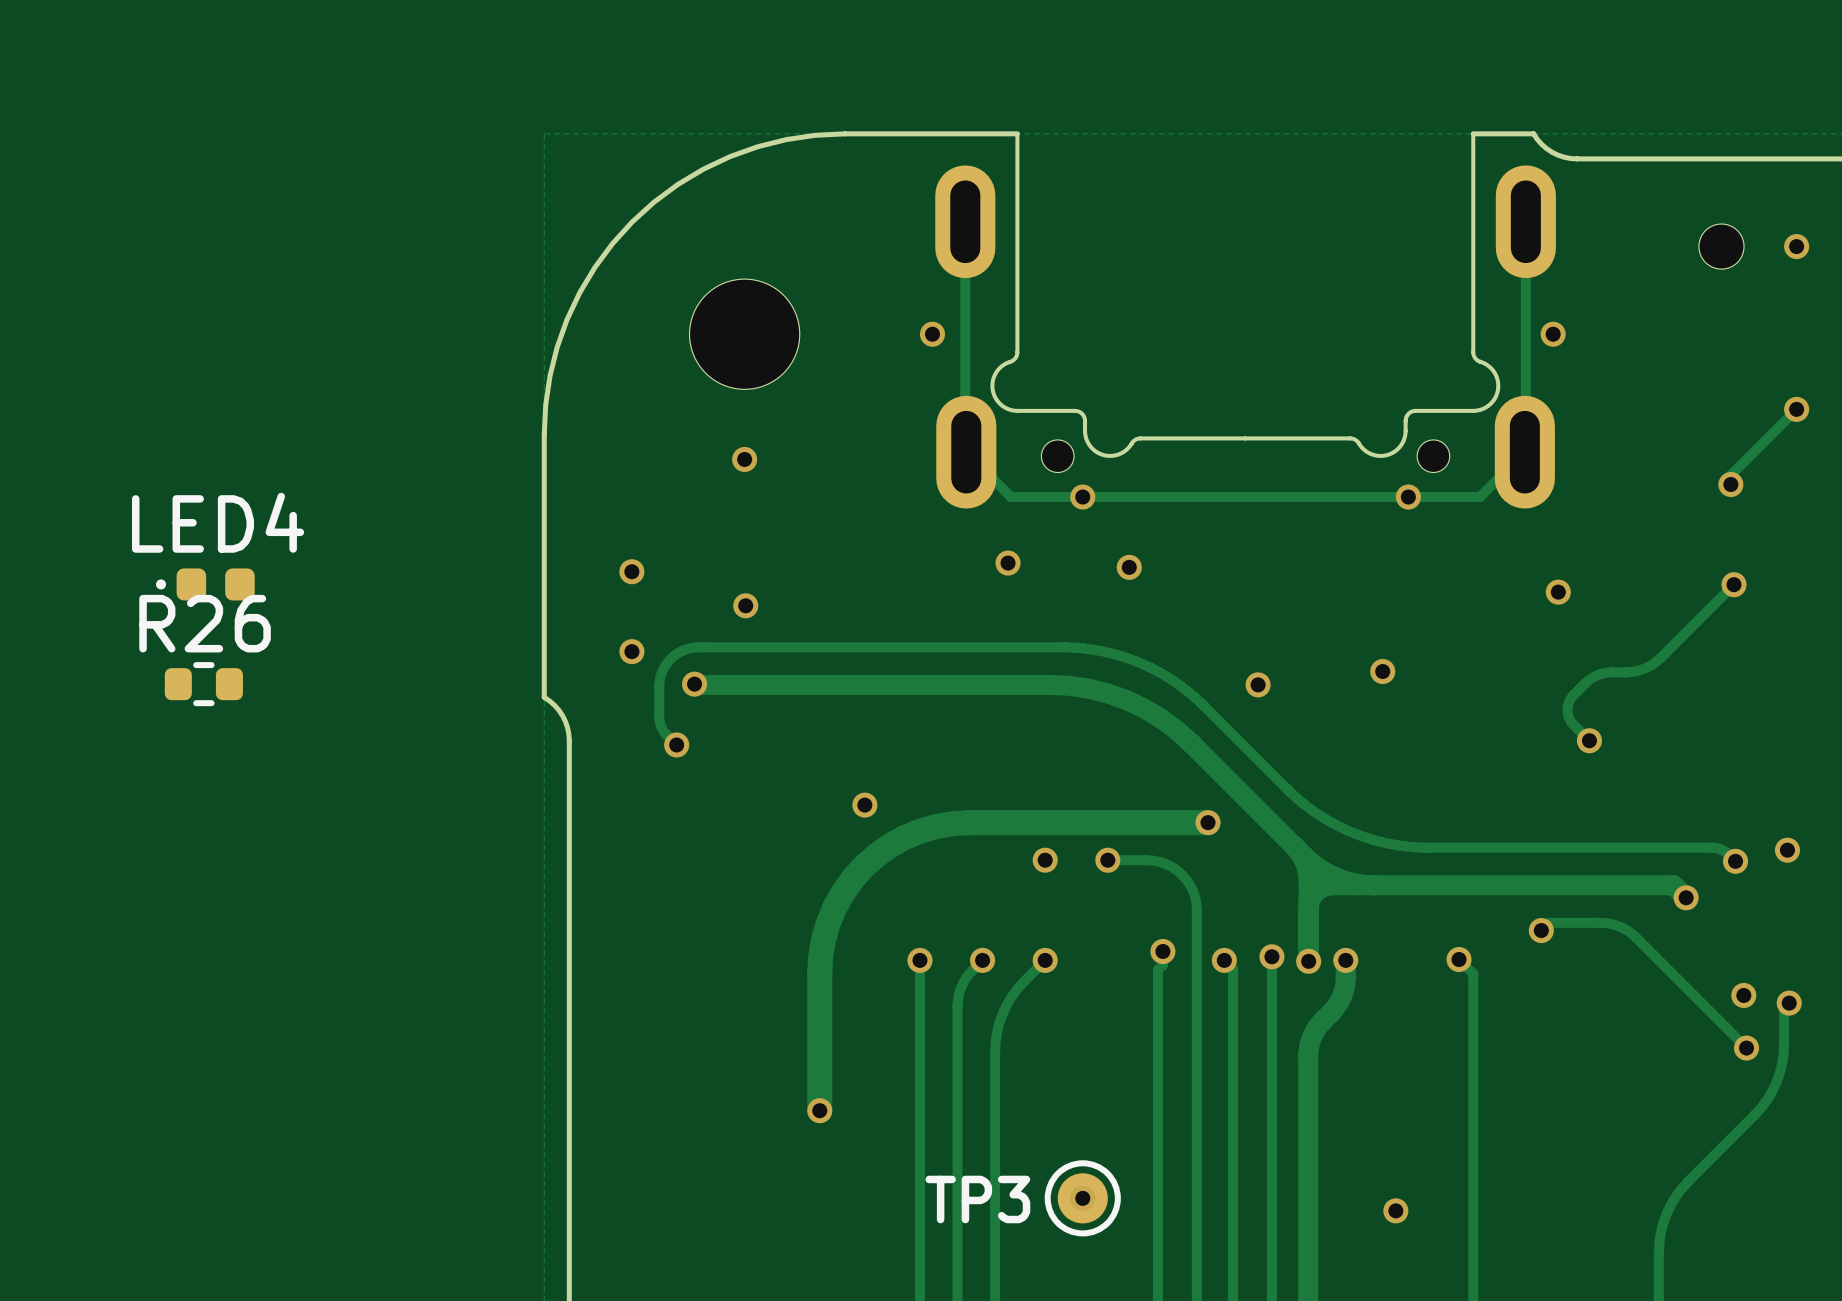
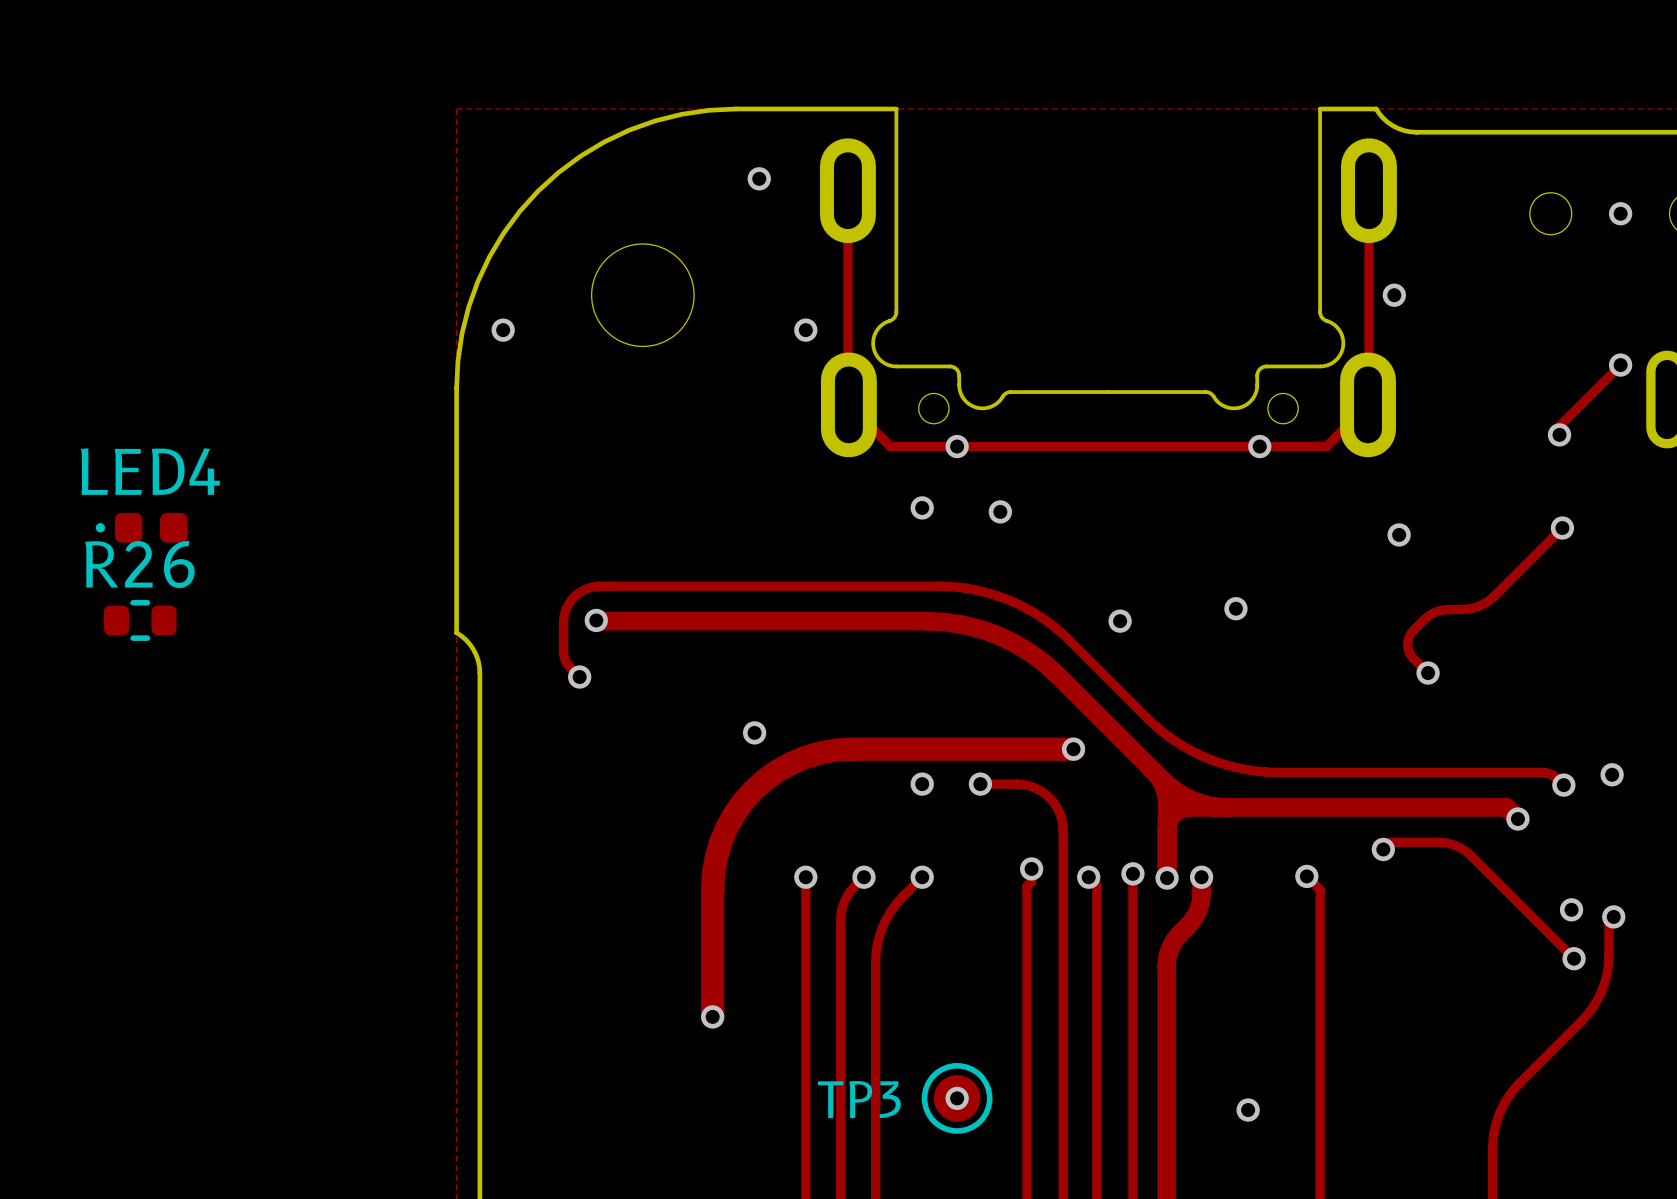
via: none -> (759, 178)
via position: (932, 334) -> (805, 330)
via: none -> (503, 330)
via: (744, 459) -> none
via position: (1008, 563) -> (922, 507)
via: (631, 571) -> none
via: (745, 605) -> none
via: (631, 651) -> none

